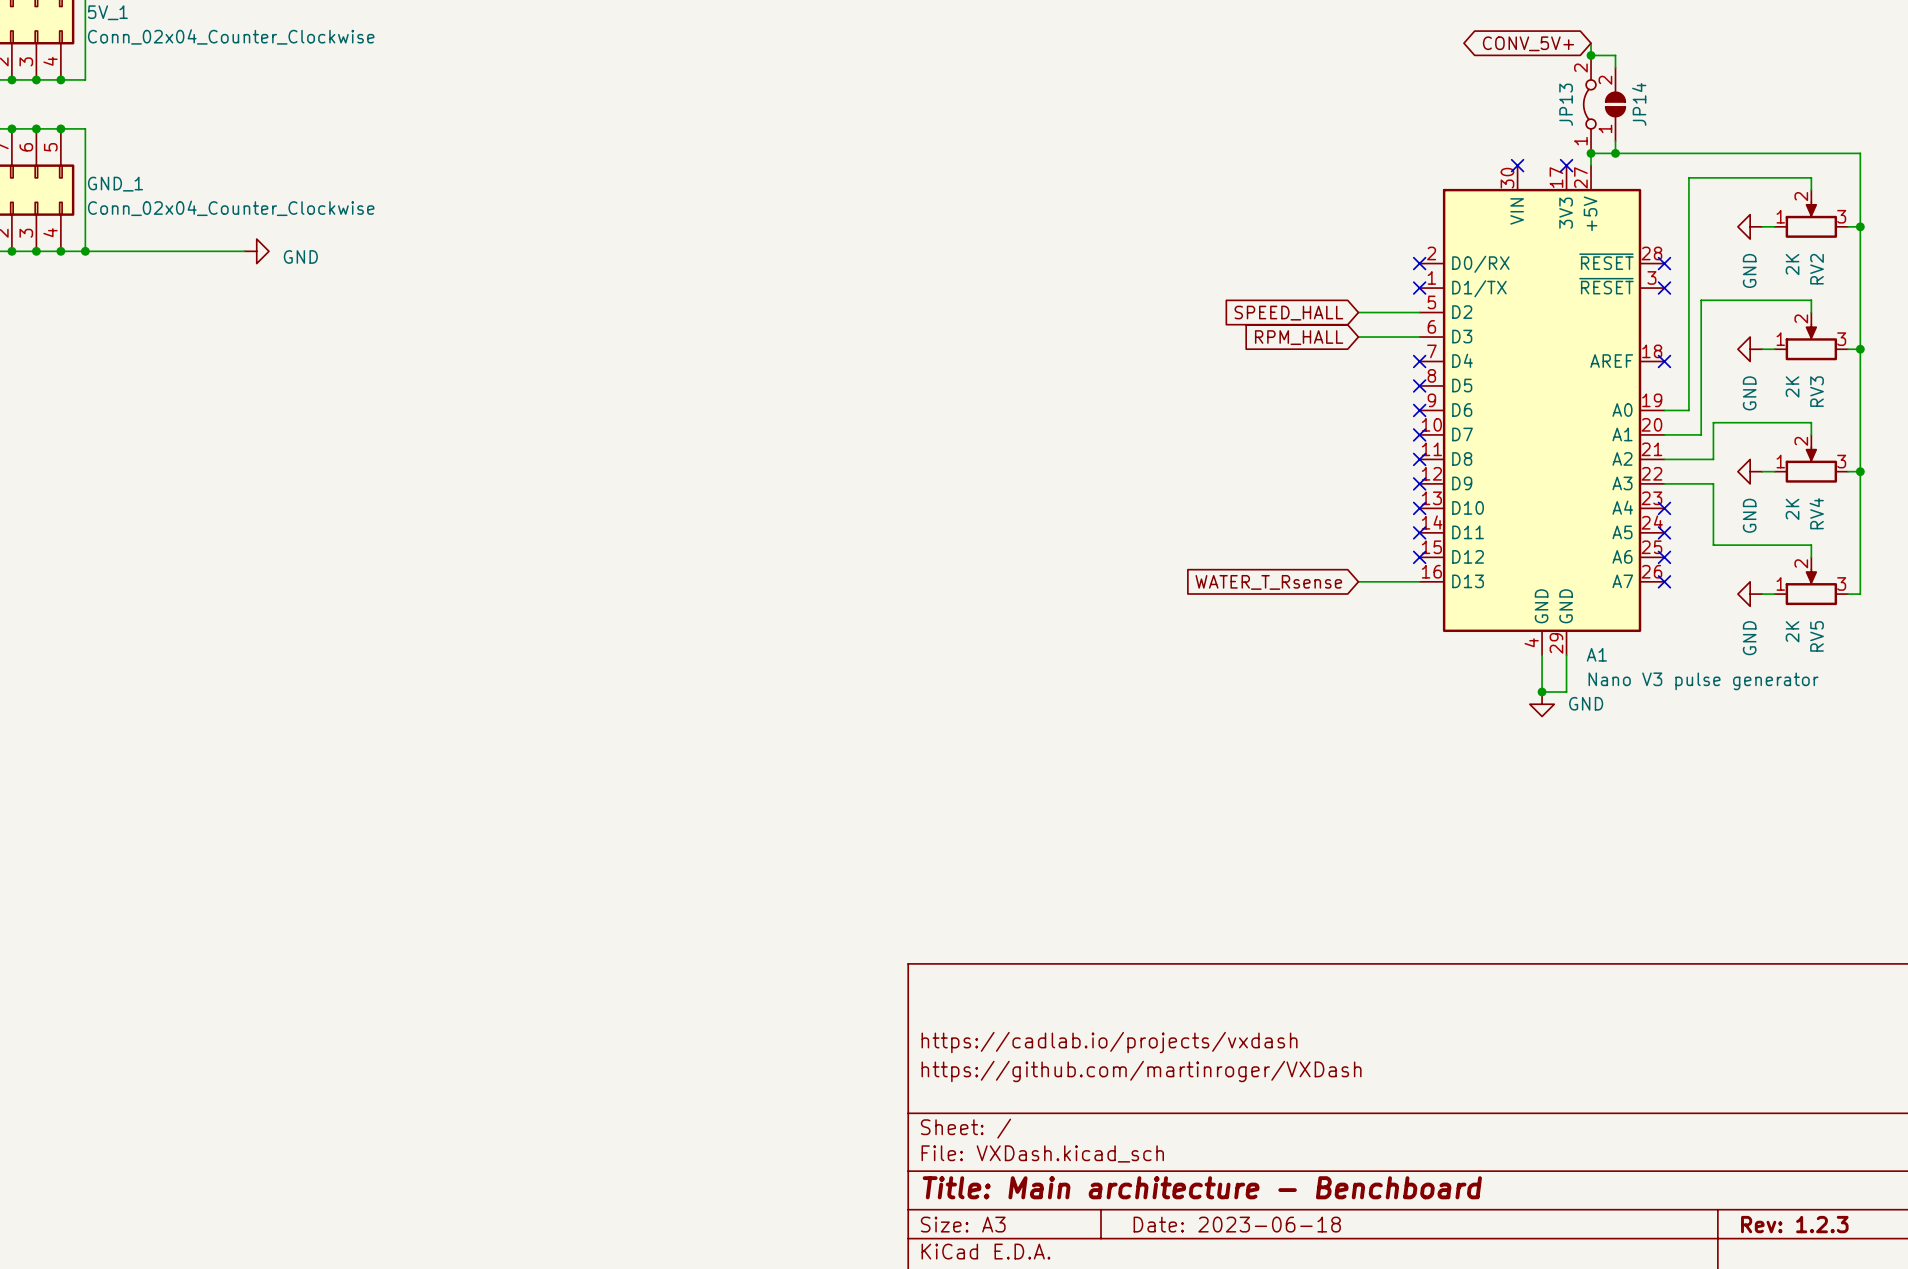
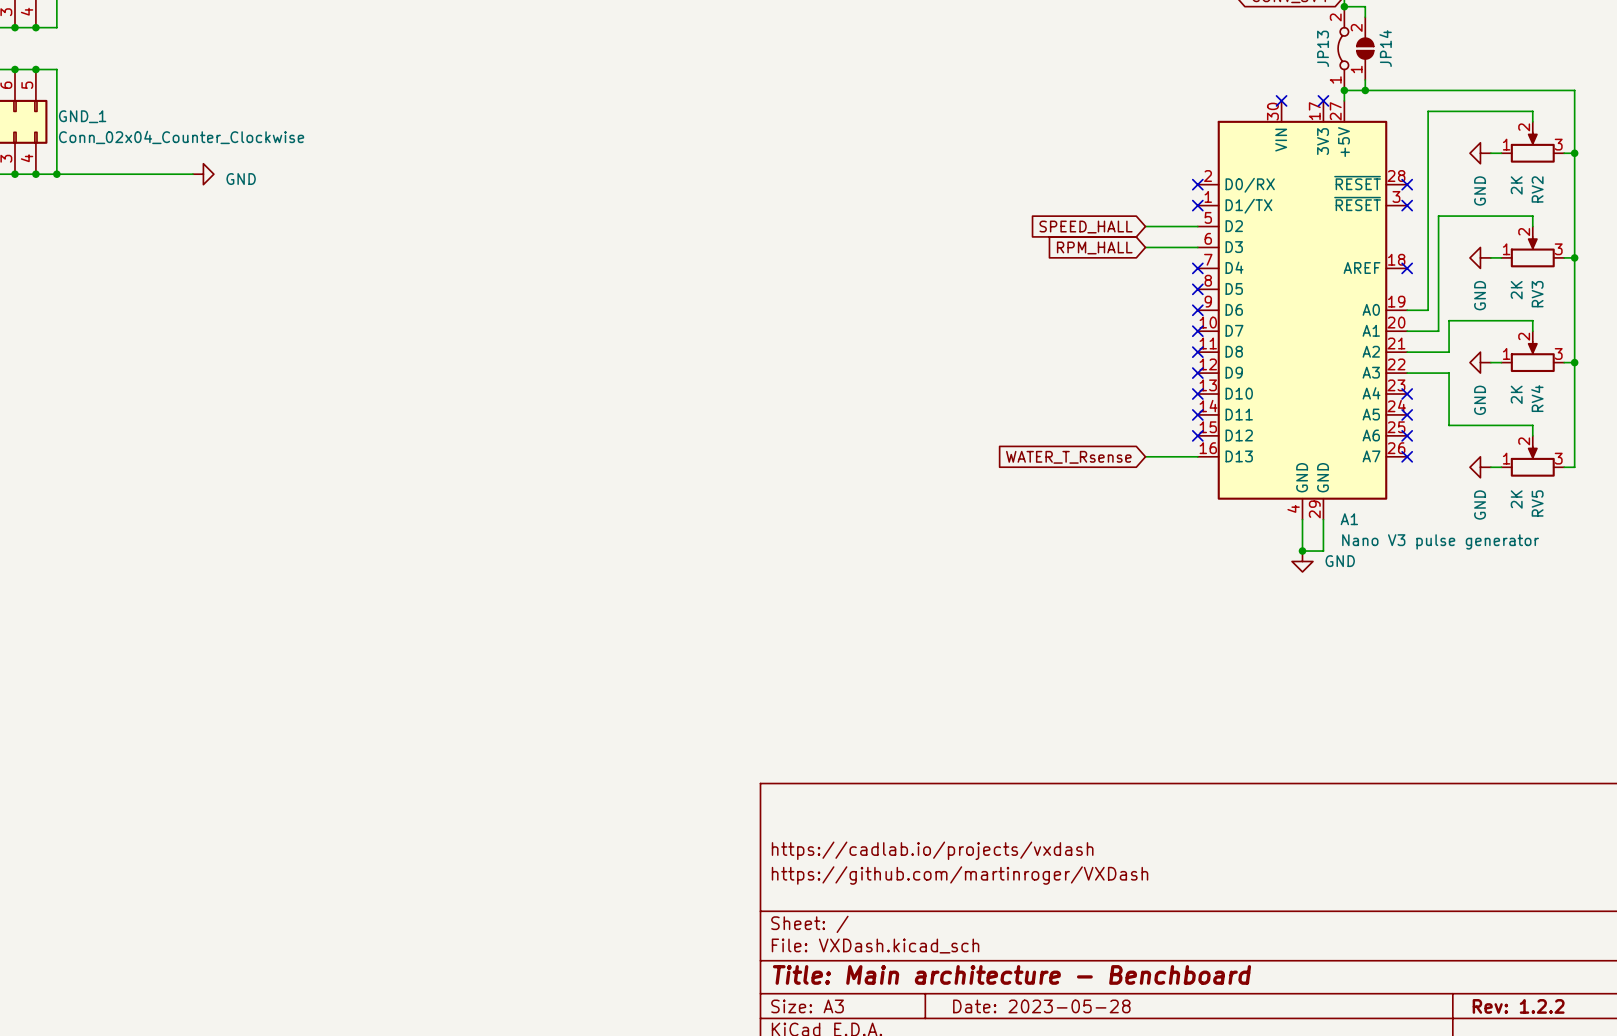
title block: Date: 2023-06-18 (1237, 1224) -> Date: 2023-05-28 (1041, 1006)
title block: Rev: 1.2.3 (1794, 1224) -> Rev: 1.2.2 (1518, 1006)

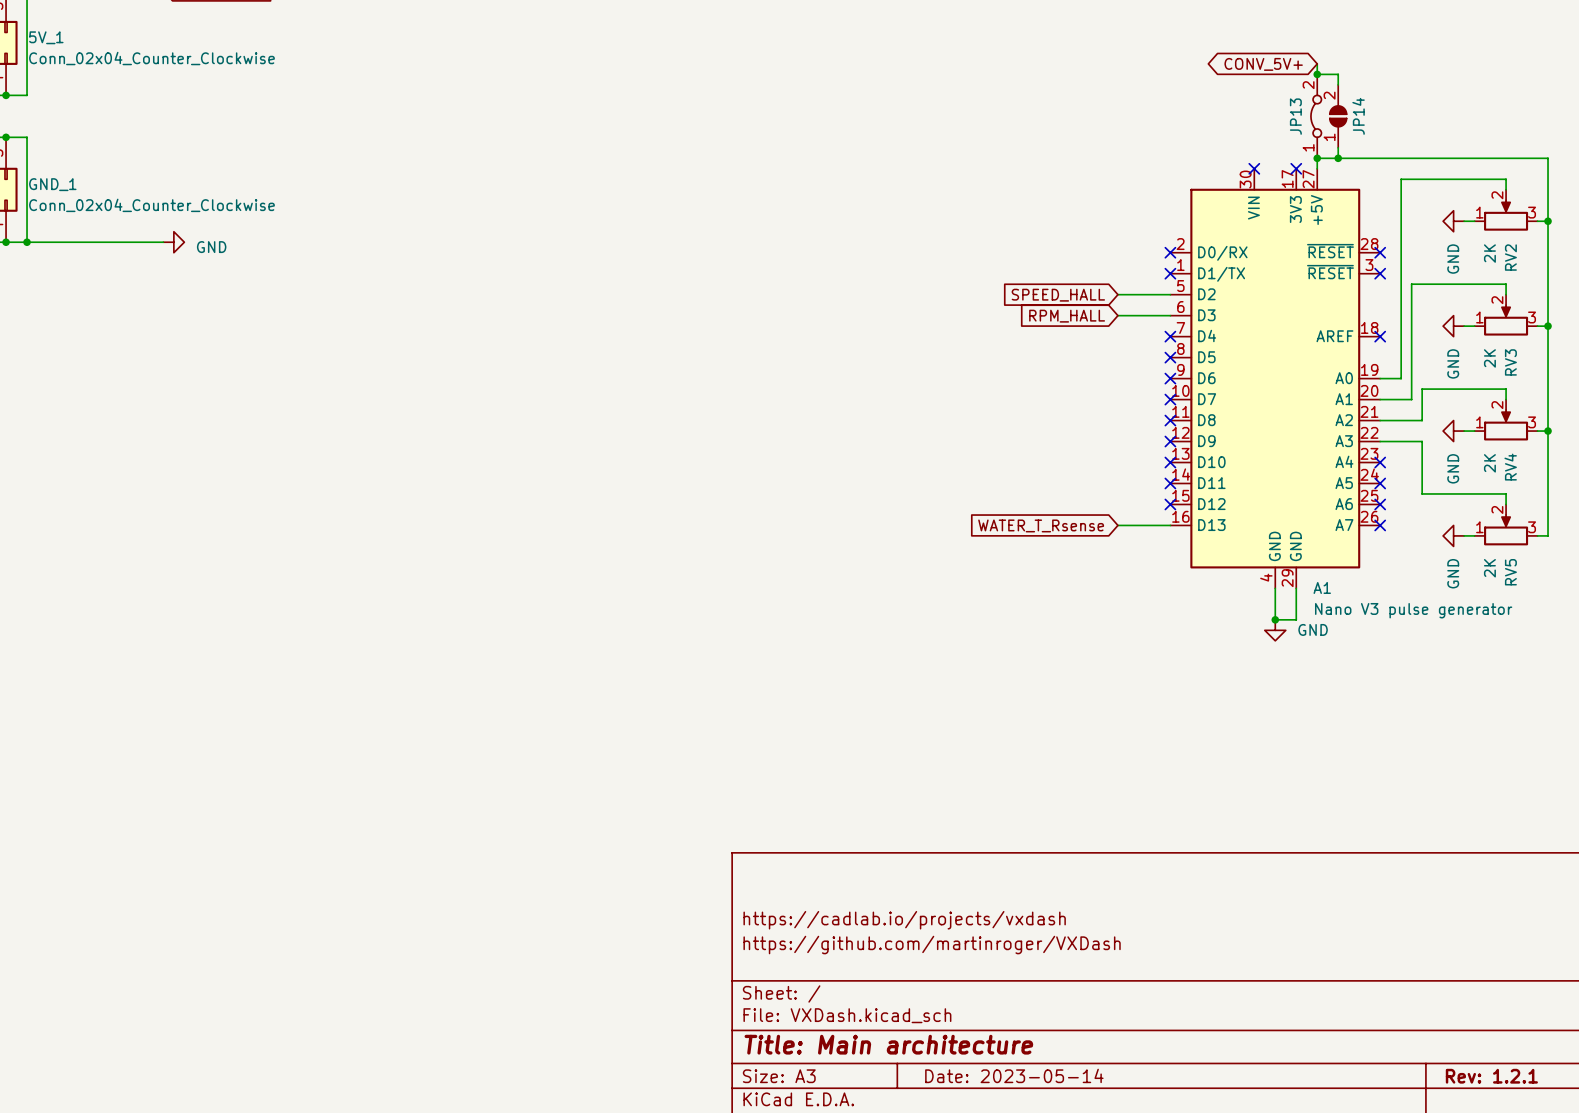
title block: Title: Main architecture - Benchboard (1011, 974) -> Title: Main architecture (888, 1044)
title block: Date: 2023-05-28 (1041, 1006) -> Date: 2023-05-14 (1014, 1075)
title block: Rev: 1.2.2 (1518, 1006) -> Rev: 1.2.1 (1491, 1076)

